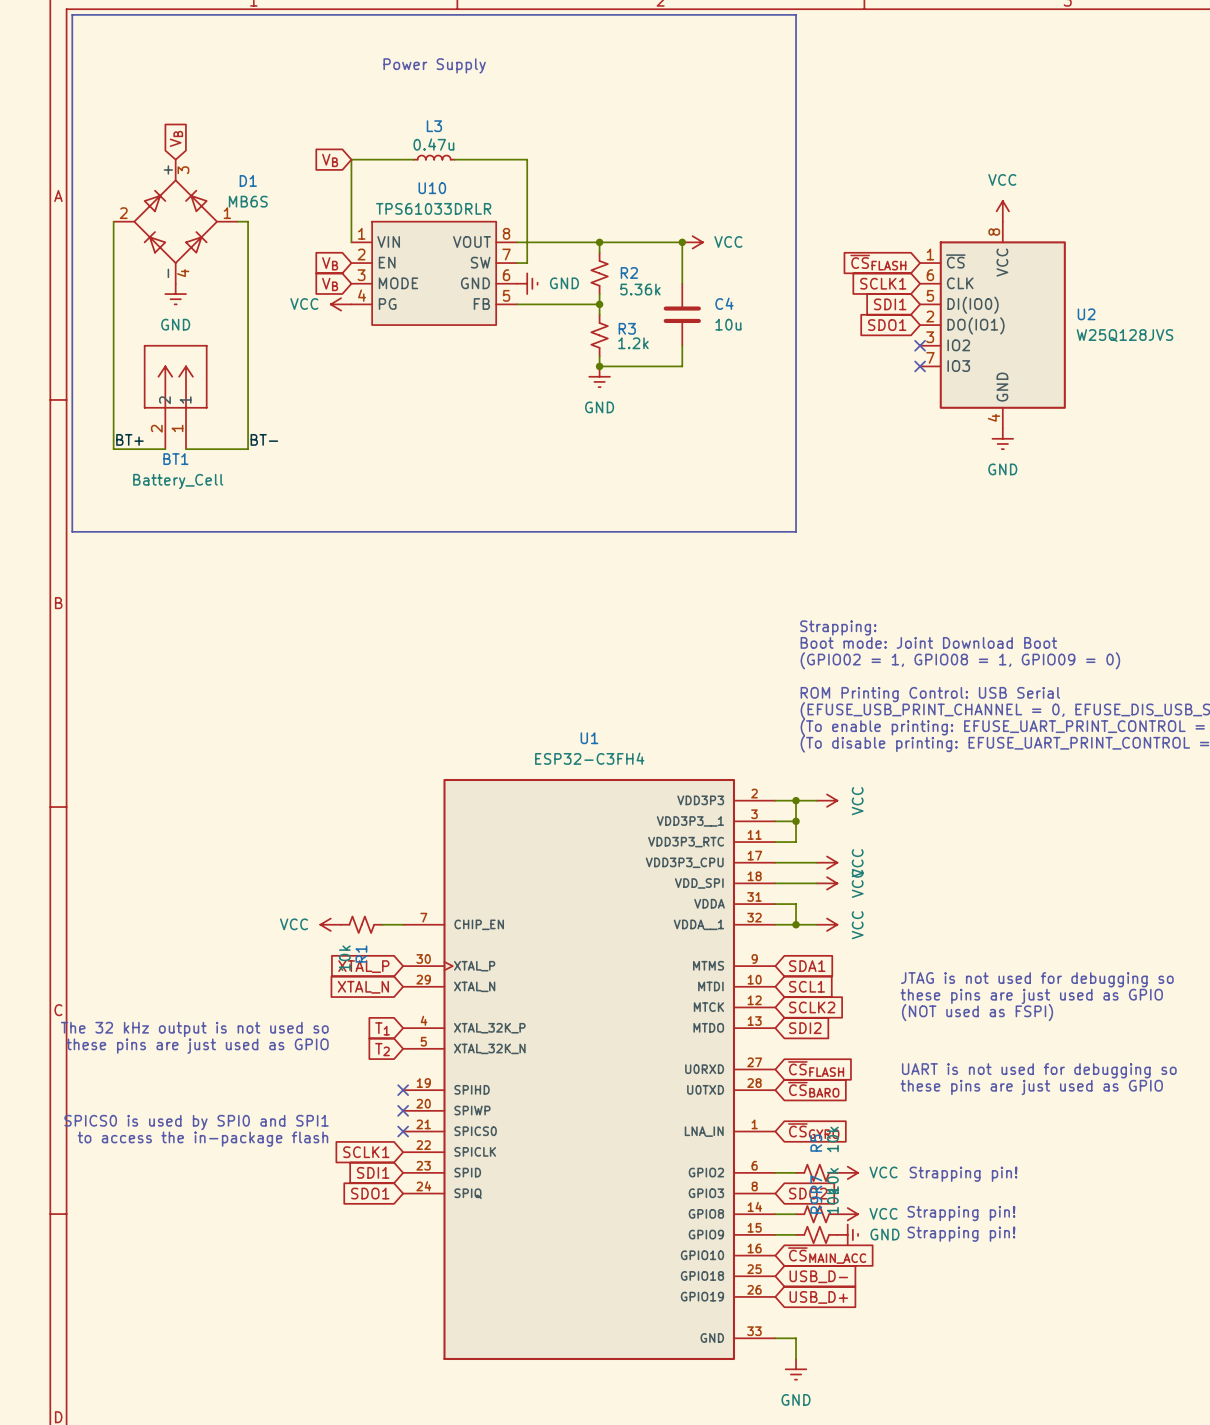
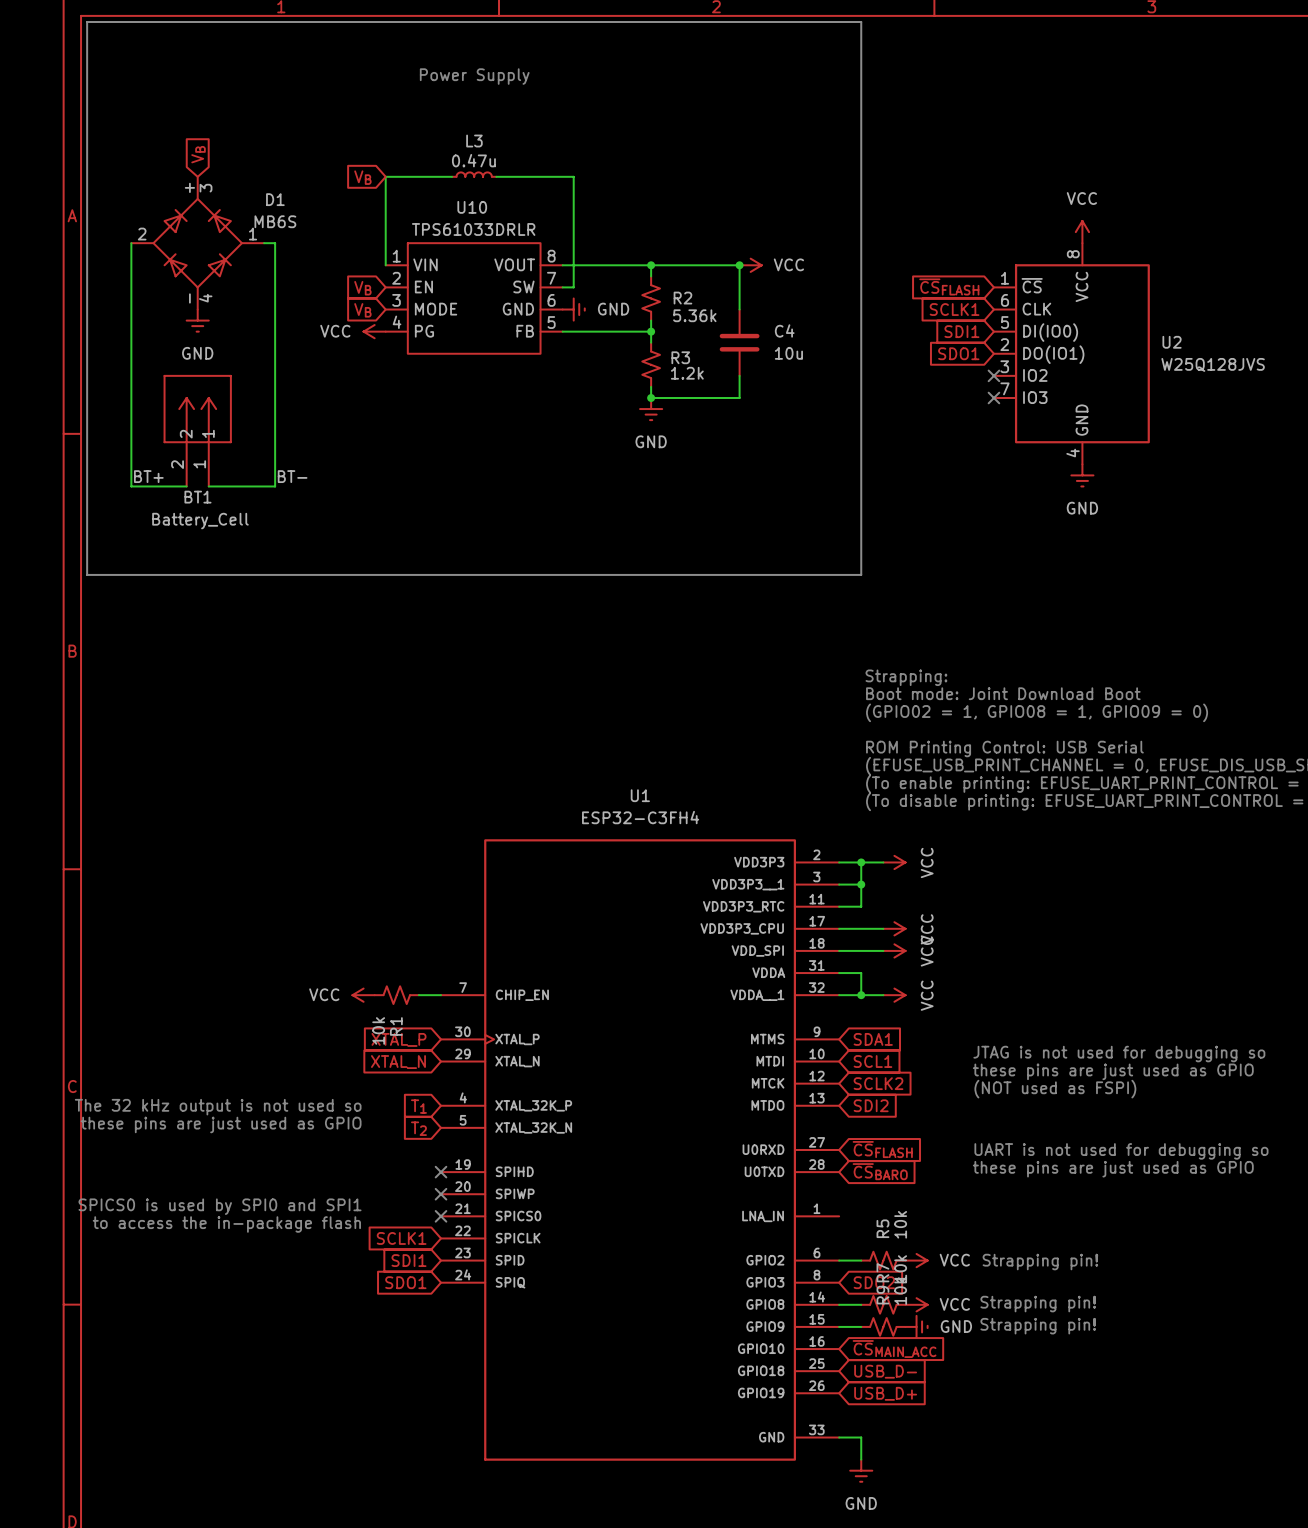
global label: ~{CS}GYRO (813, 1131) -> none

